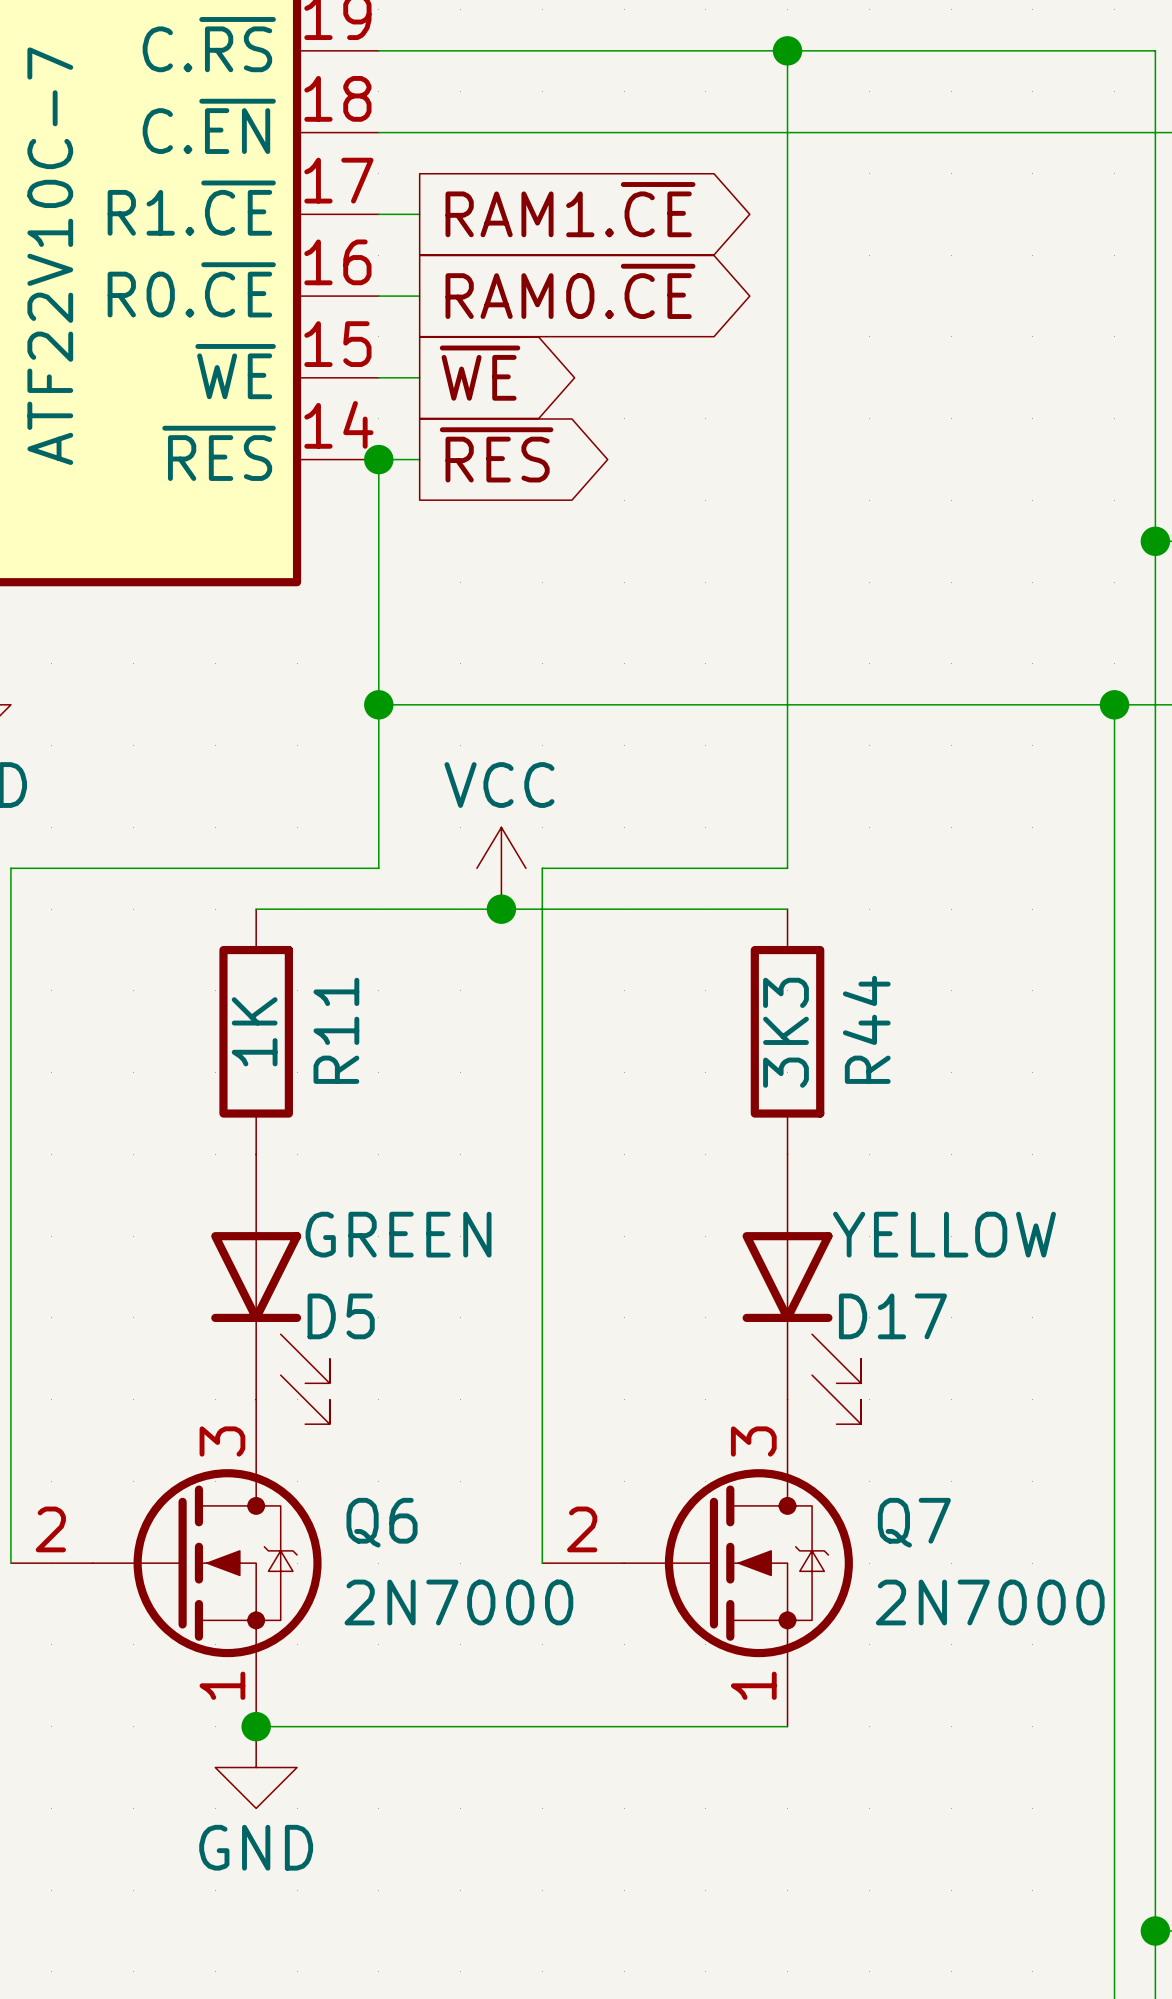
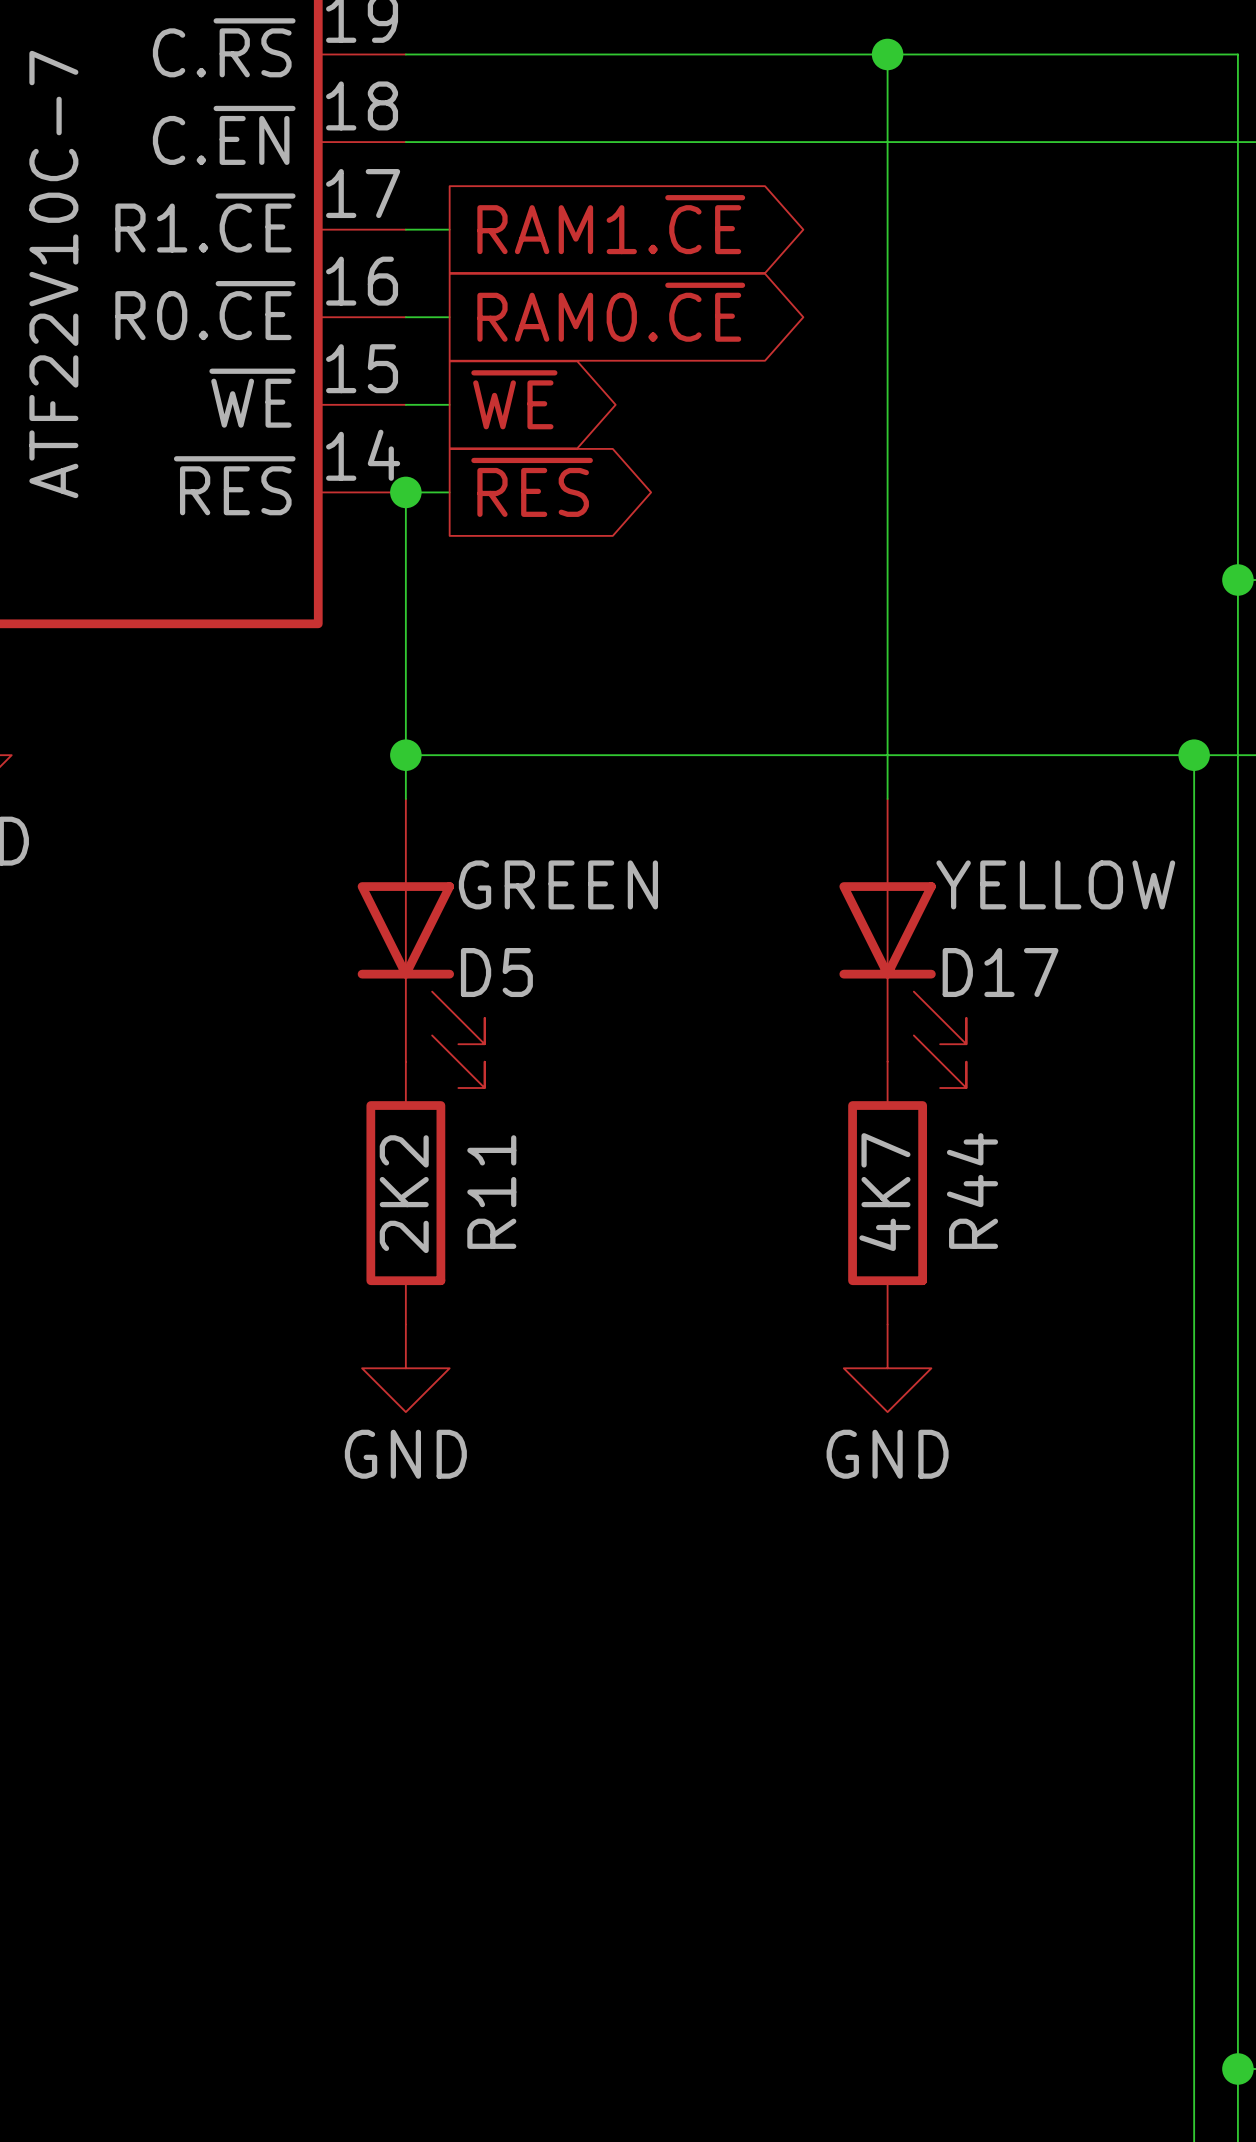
wire: (787, 50) (787, 868) (542, 868) (542, 1563) -> none
junction position: (787, 50) -> (887, 54)
wire: none -> (887, 54) (887, 798)
wire: (378, 745) (378, 868) (10, 868) (10, 1563) -> none
power symbol: VCC (501, 868) -> none
wire: (256, 909) (787, 909) -> none
junction: (501, 909) -> none
R11 value: 1K (254, 1031) -> 2K2 (404, 1194)
R11 position: (256, 1031) -> (405, 1193)
R44 position: (787, 1031) -> (887, 1193)
R44 value: 3K3 (785, 1032) -> 4K7 (884, 1192)
power symbol: none -> GND (405, 1368)
power symbol: none -> GND (887, 1368)
D5 position: (270, 1289) -> (421, 943)
D17 position: (801, 1289) -> (902, 943)
Q6: 2N7000 (166, 1563) -> none
Q7: 2N7000 (697, 1563) -> none
wire: (256, 1726) (787, 1726) -> none
junction: (256, 1726) -> none
power symbol: GND (256, 1767) -> none

